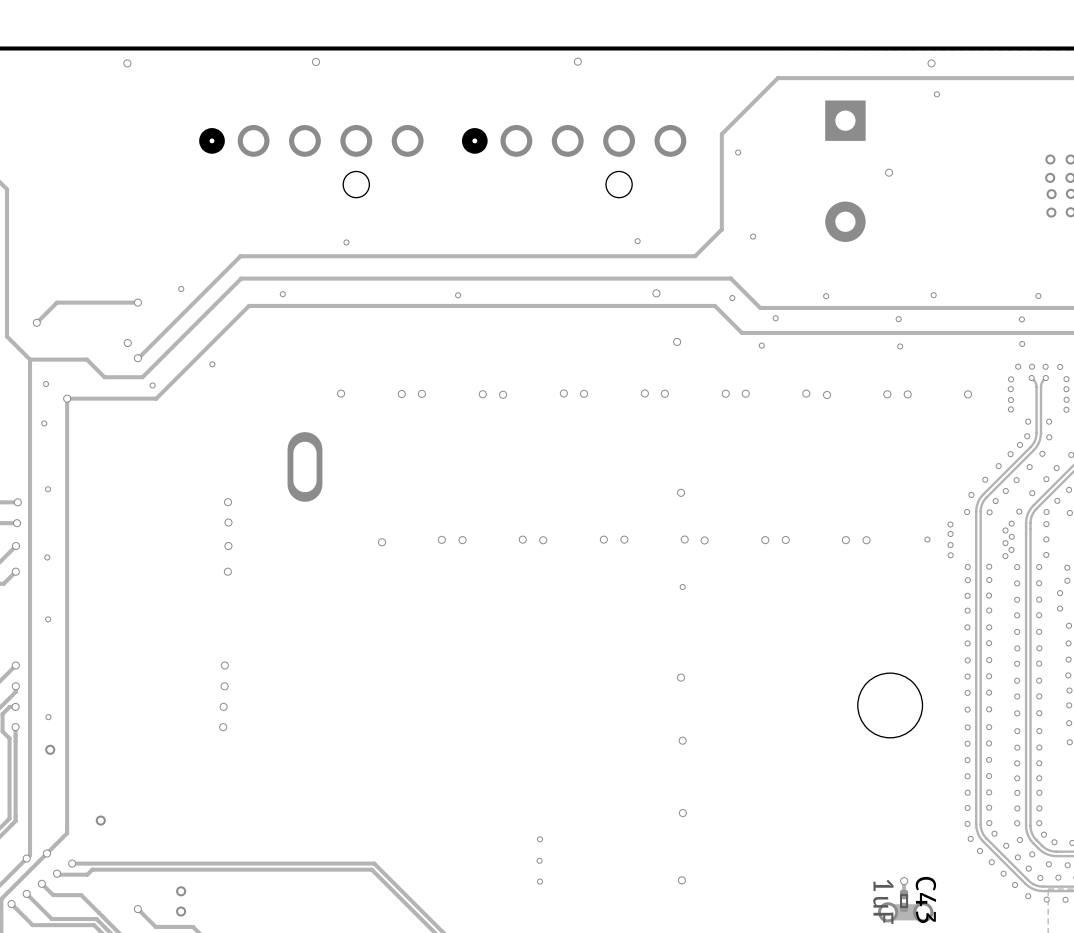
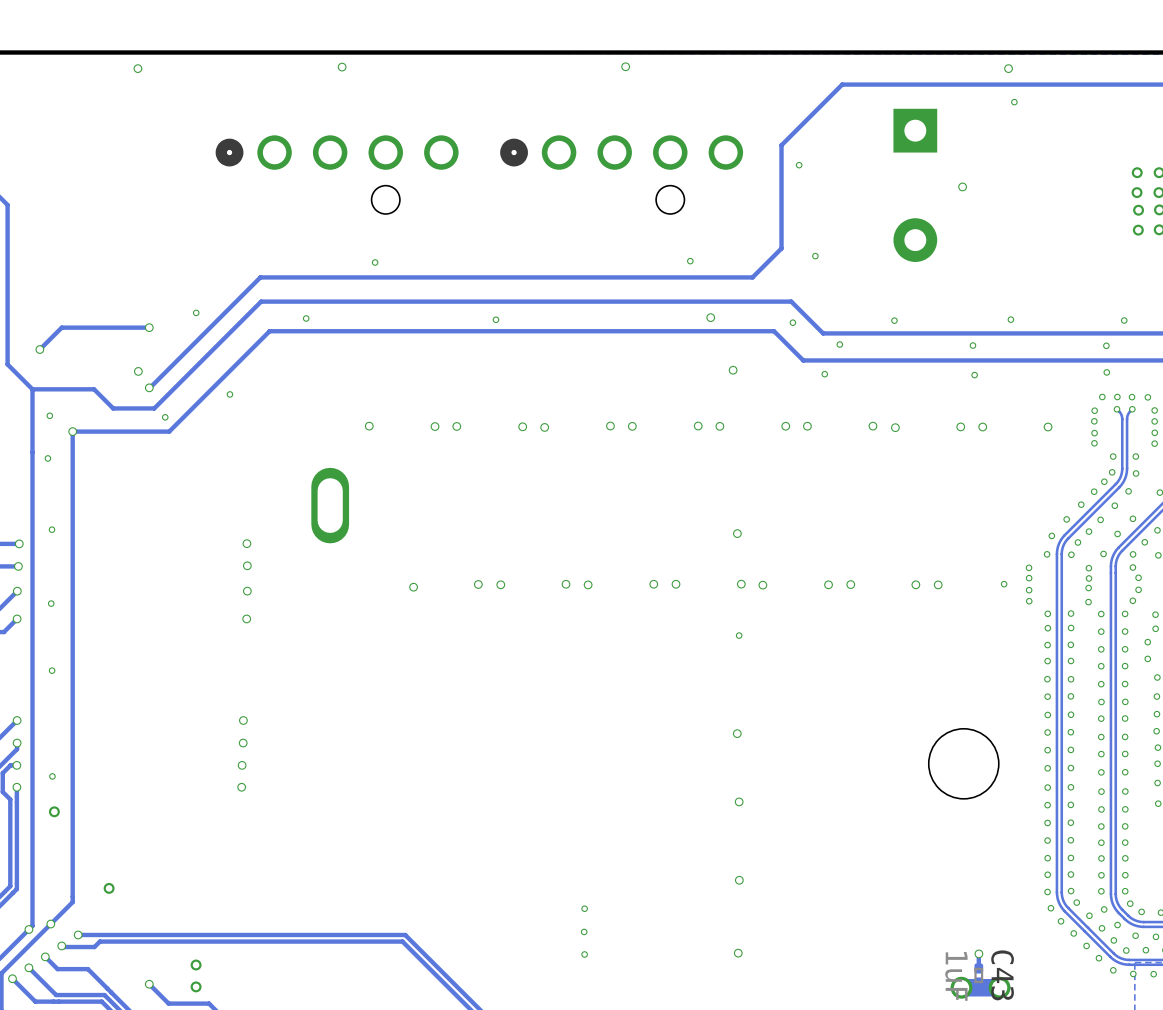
via: (1056, 468) -> none
via: (1011, 523) -> none
via: none -> (1088, 568)
via: (1005, 530) -> none
via: none -> (1138, 577)
via: none -> (1088, 578)
via: (1011, 536) -> none
via: (1046, 539) -> none
via: none -> (1138, 589)
via: (1011, 549) -> none

